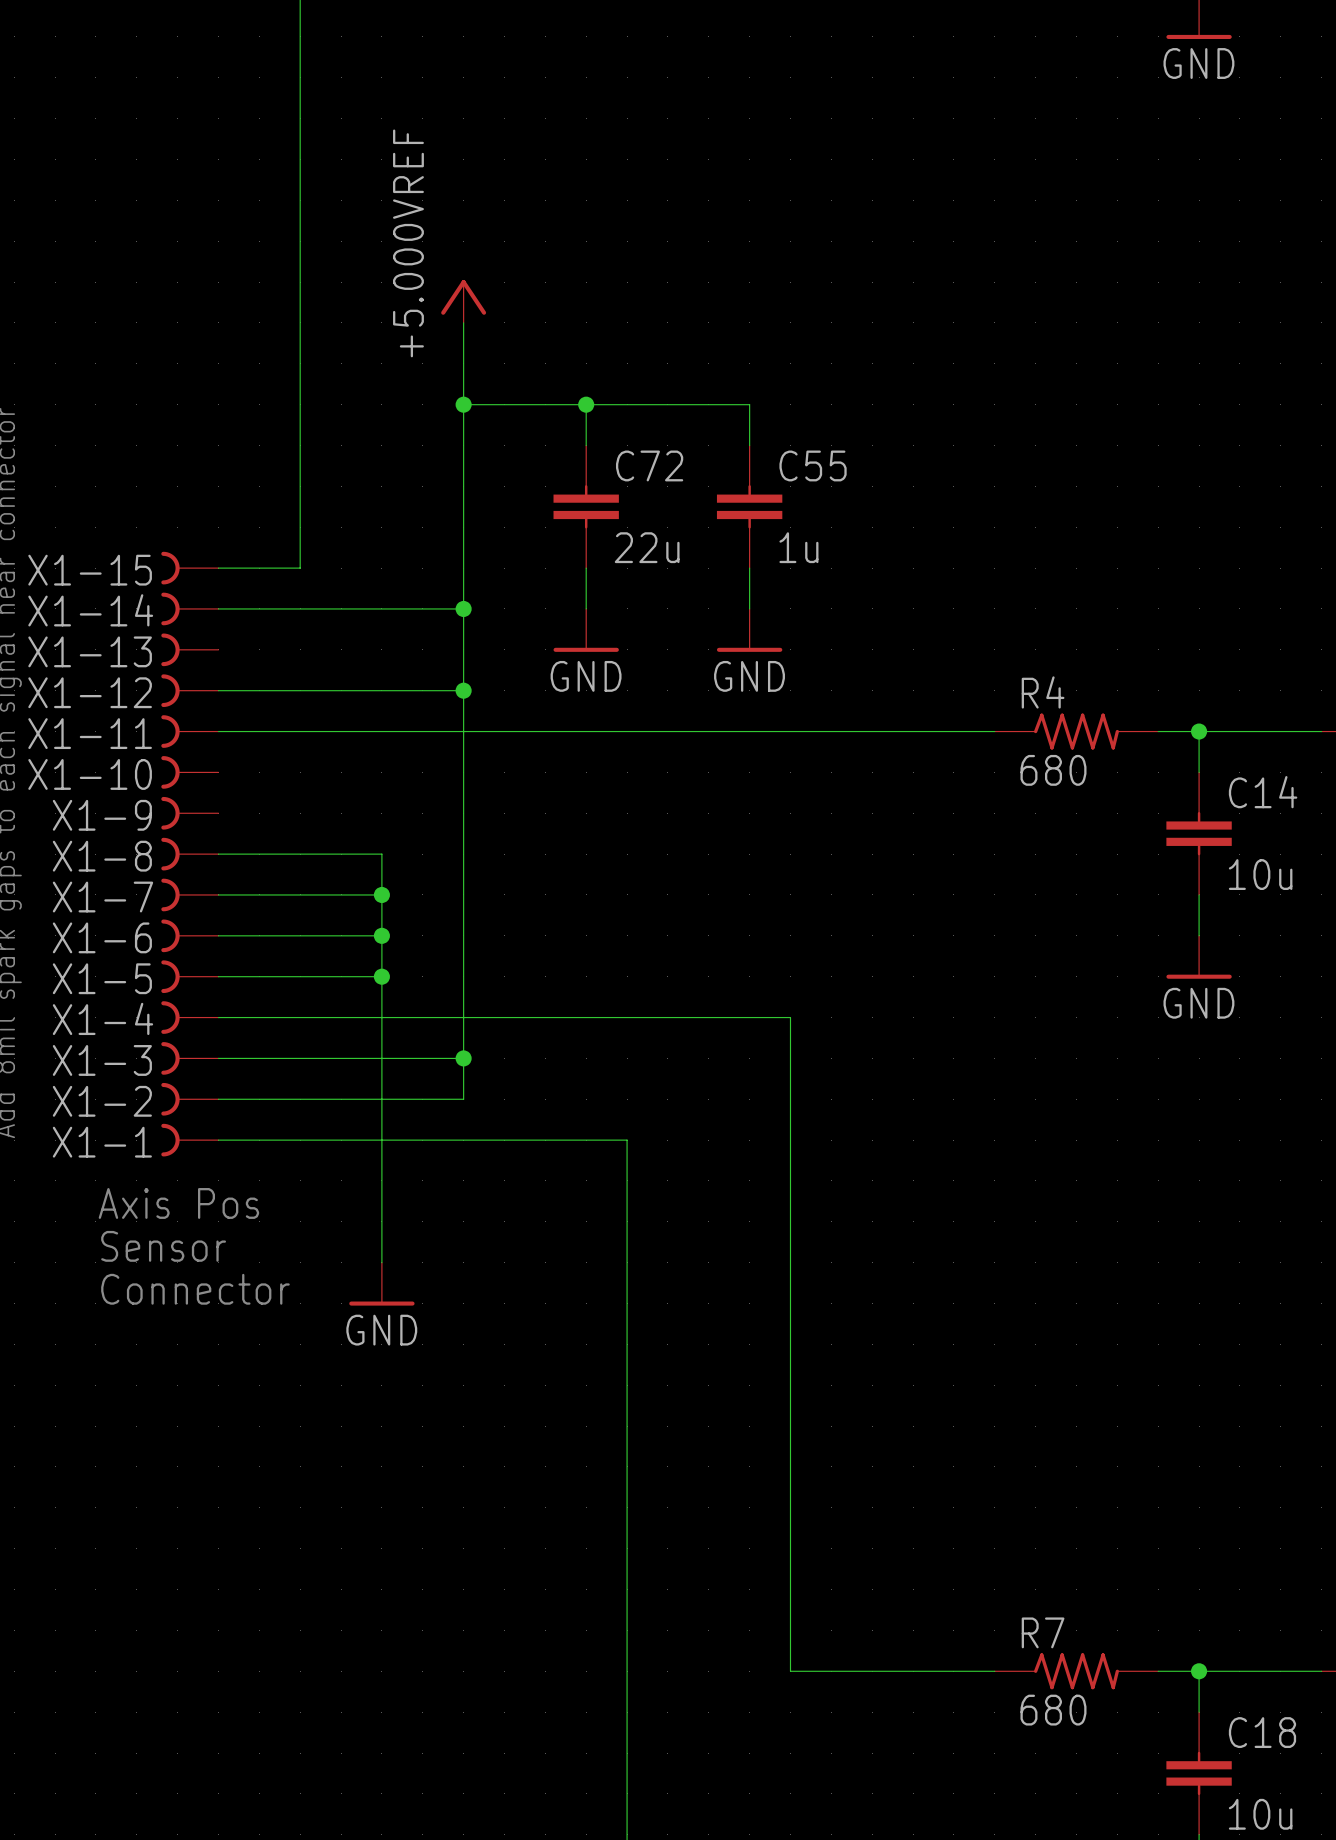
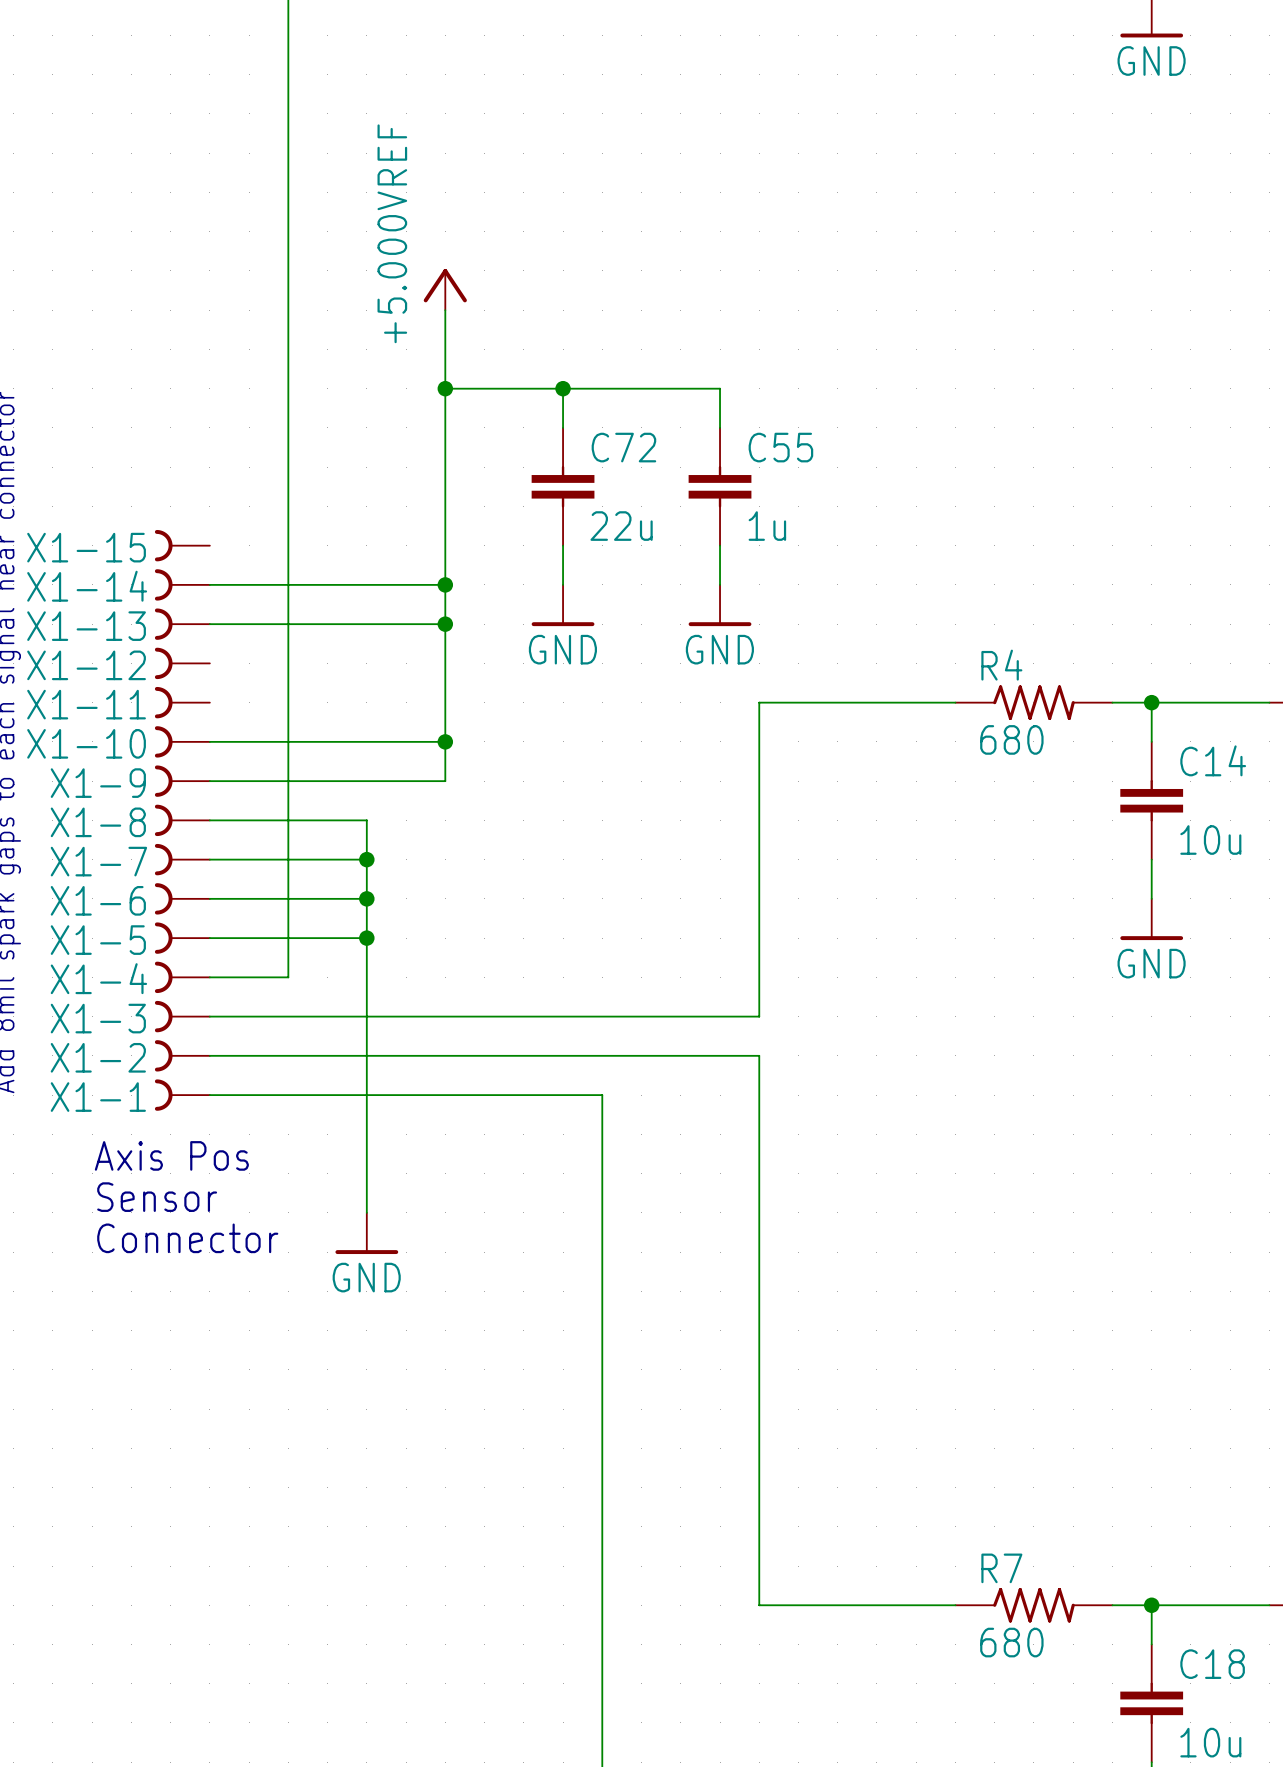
wire: (218, 568) (300, 568) -> (288, 977) (288, 545)
junction: none -> (445, 624)
wire: (218, 690) (463, 690) -> (209, 624) (445, 624)
junction: (463, 690) -> none
wire: (218, 731) (790, 731) -> none
wire: none -> (209, 741) (445, 741)
junction: none -> (445, 741)
wire: (463, 813) (463, 1099) -> (445, 781) (209, 781)
wire: (300, 1017) (790, 1017) -> (759, 702) (759, 977)
junction: (463, 1058) -> none
wire: (790, 1058) (790, 1099) -> (759, 1016) (445, 1016)
wire: none -> (445, 1055) (759, 1055)

